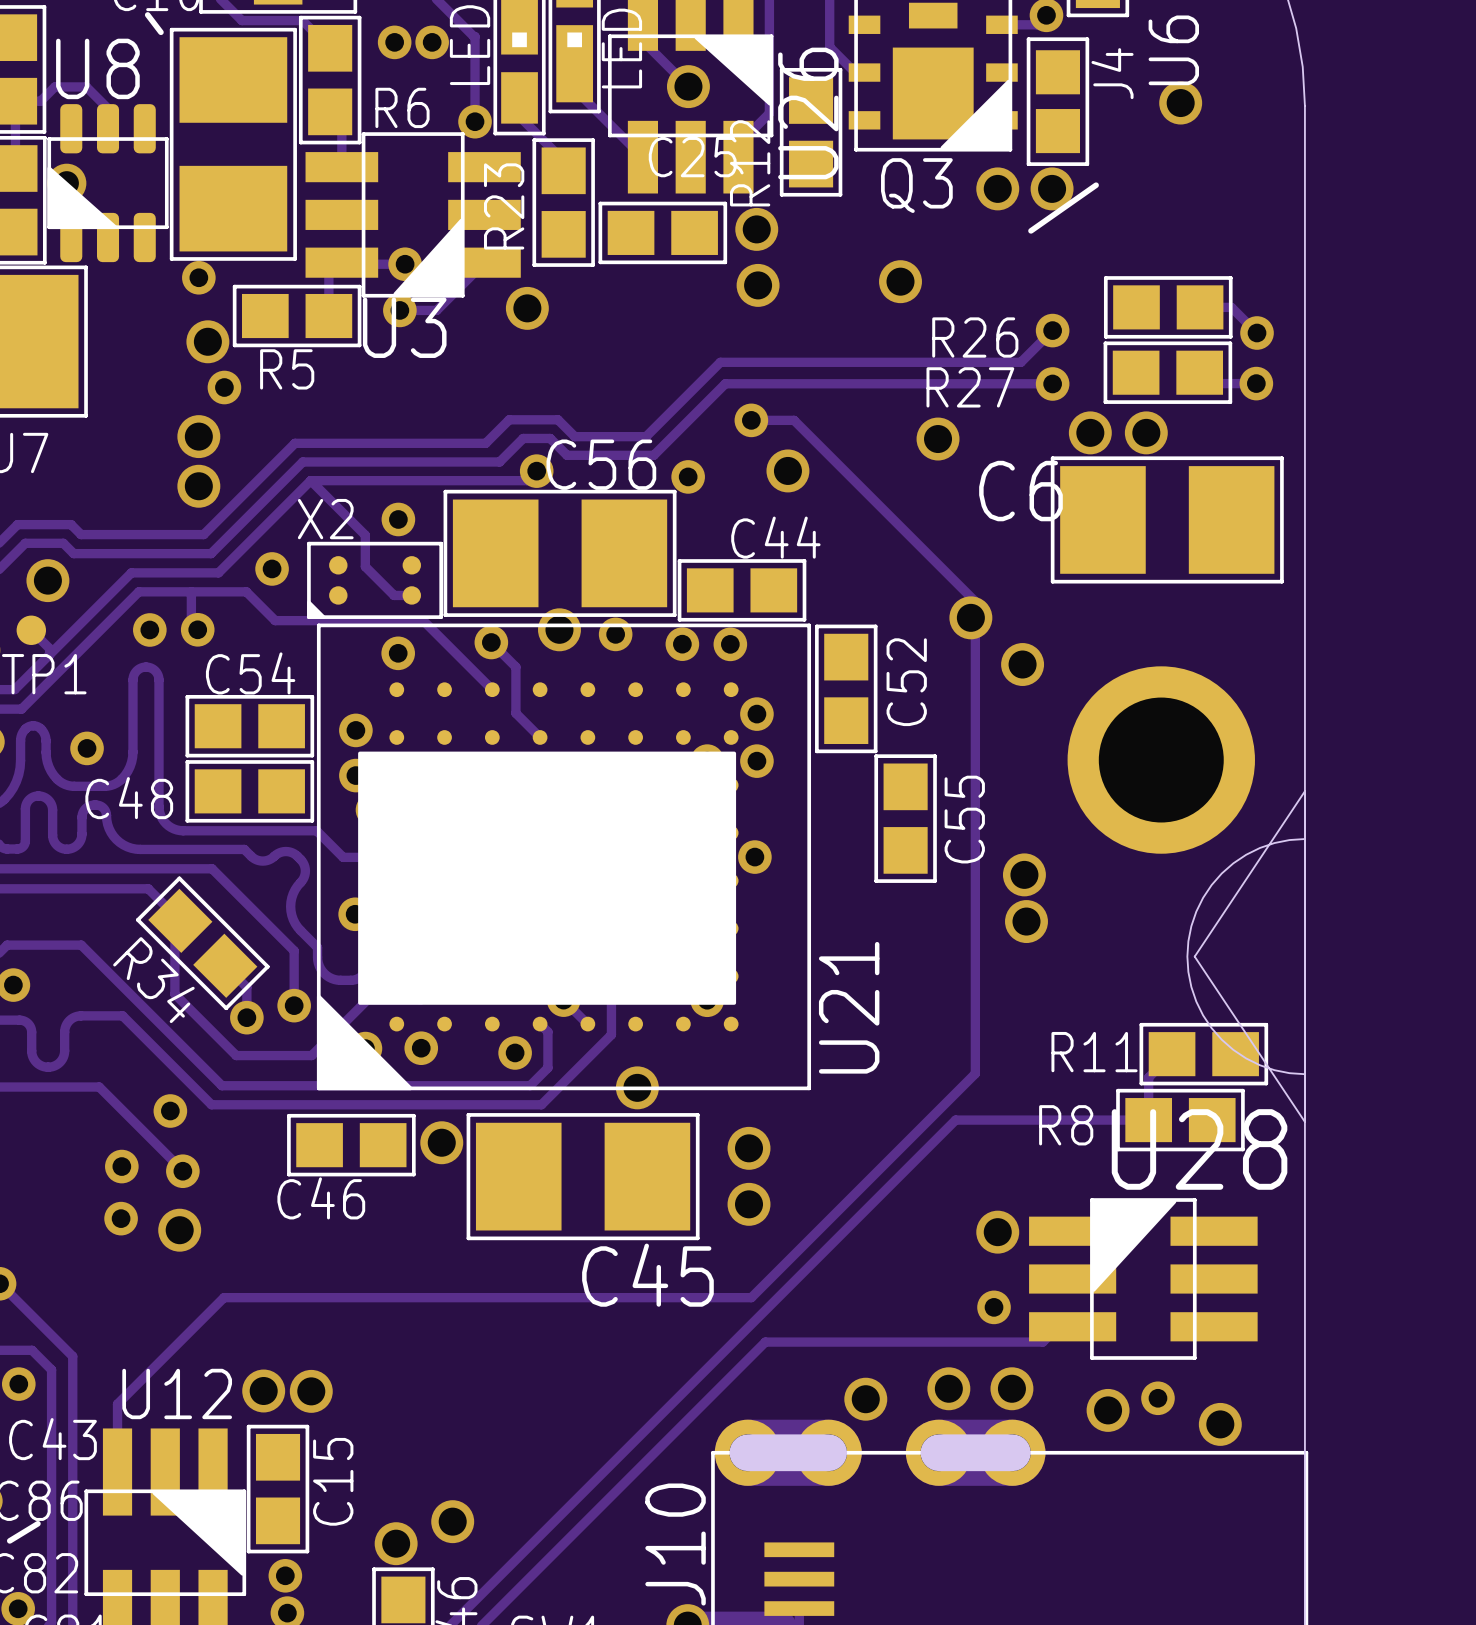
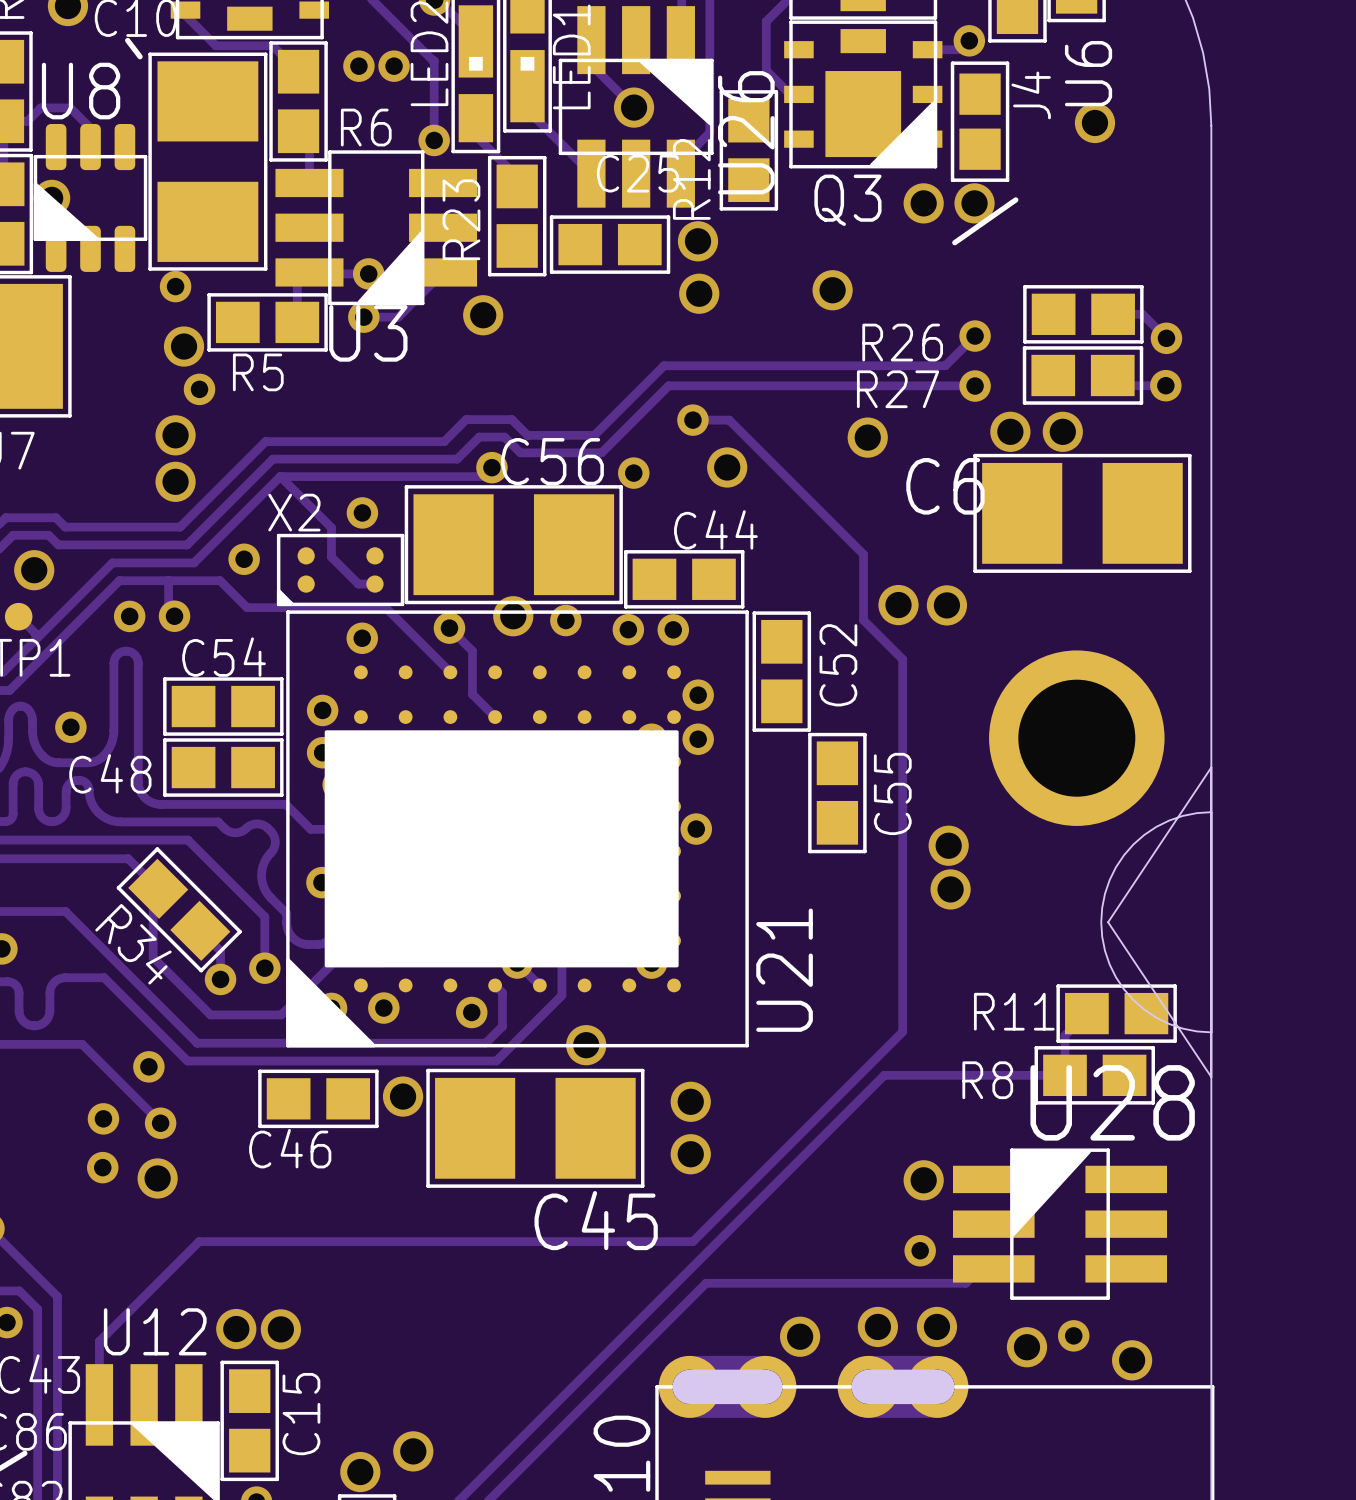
track: (790, 420) (794, 420) (975, 601) (975, 675) -> (729, 420) (863, 554) (863, 620) (902, 659)
via position: (1022, 664) -> (946, 605)

